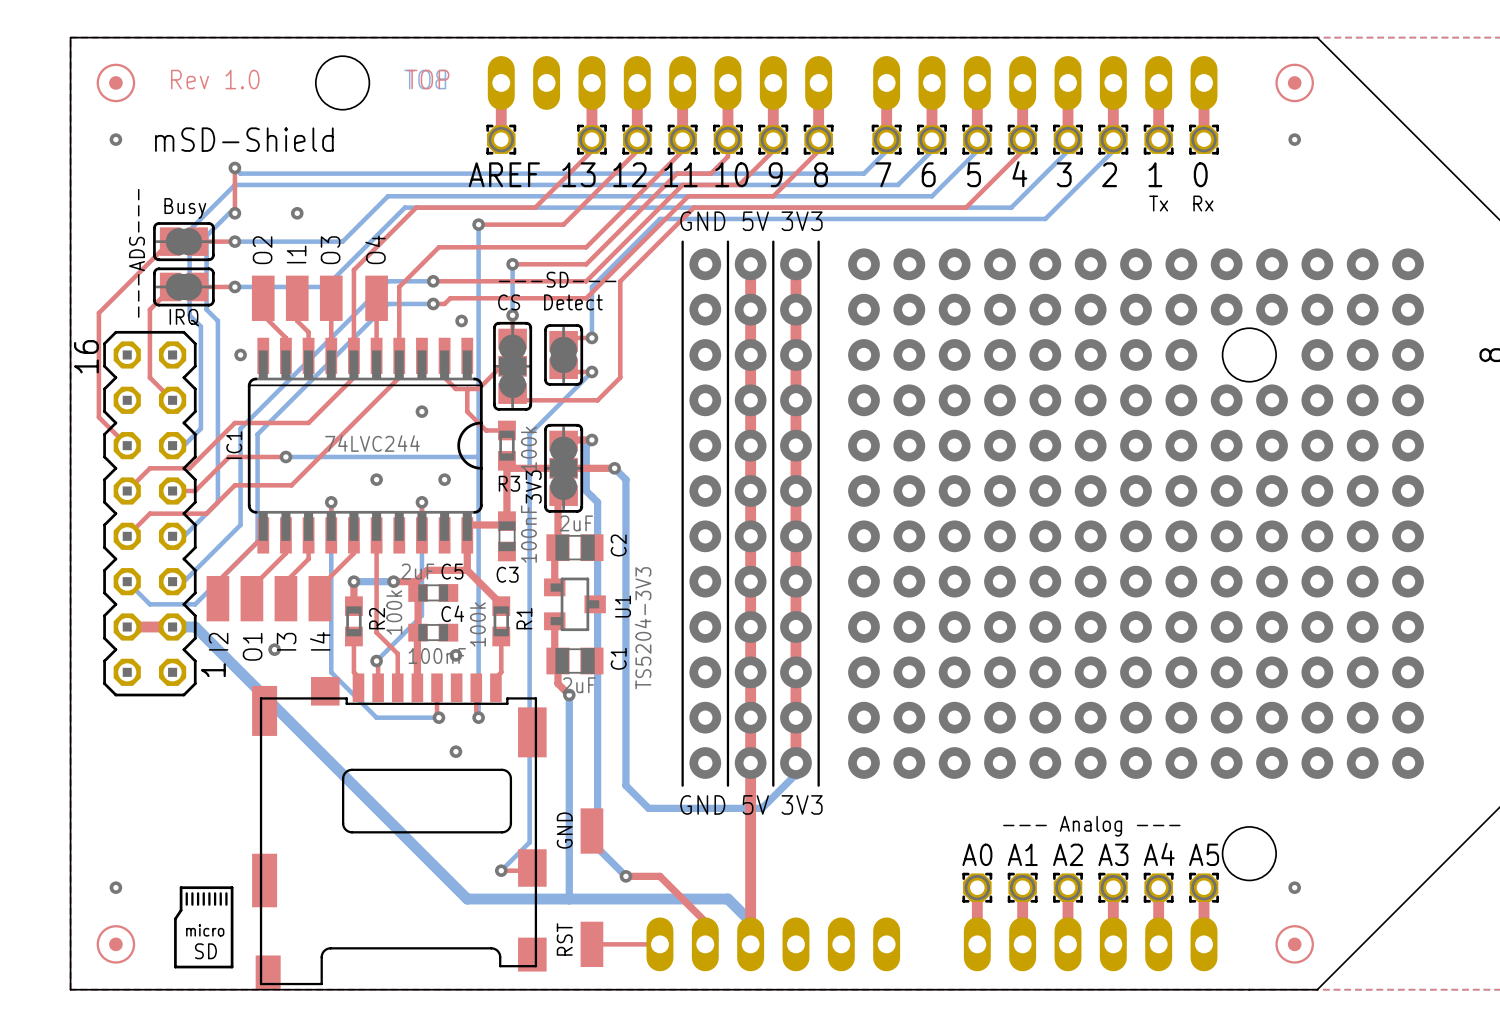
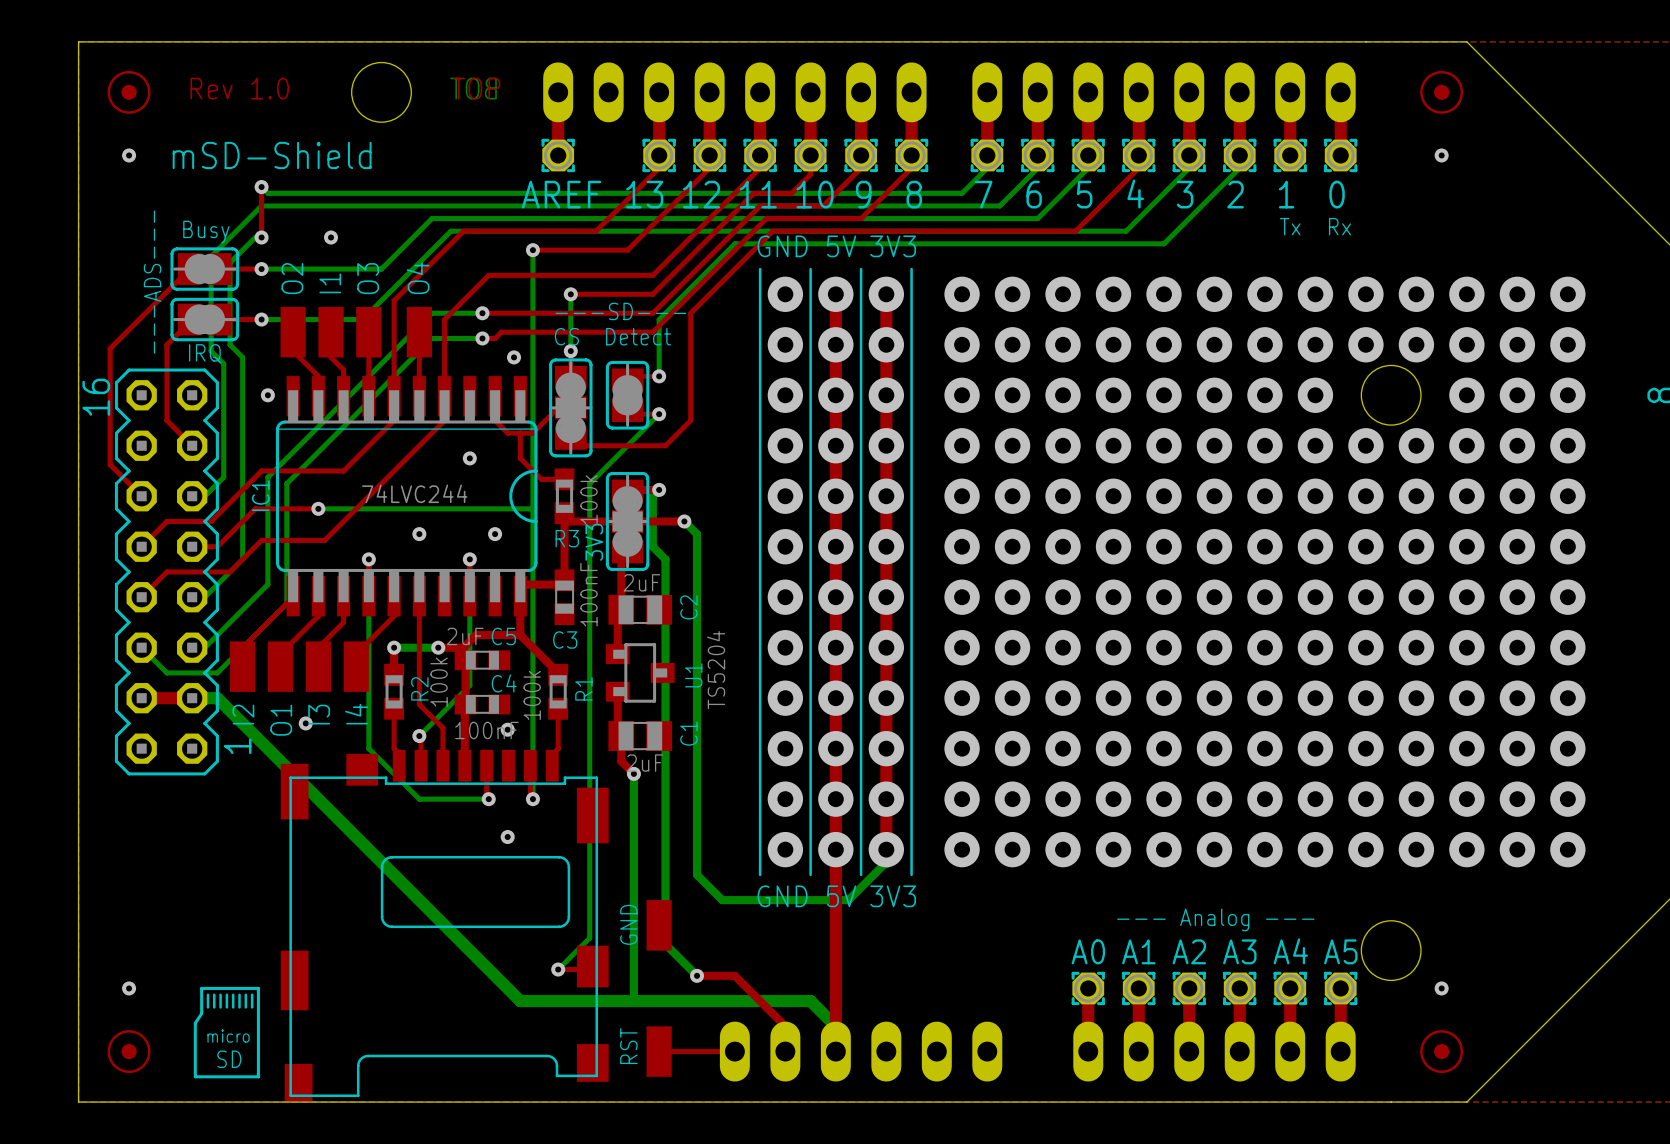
U1 value: TS5204-3V3 (643, 628) -> TS5204 (716, 670)

